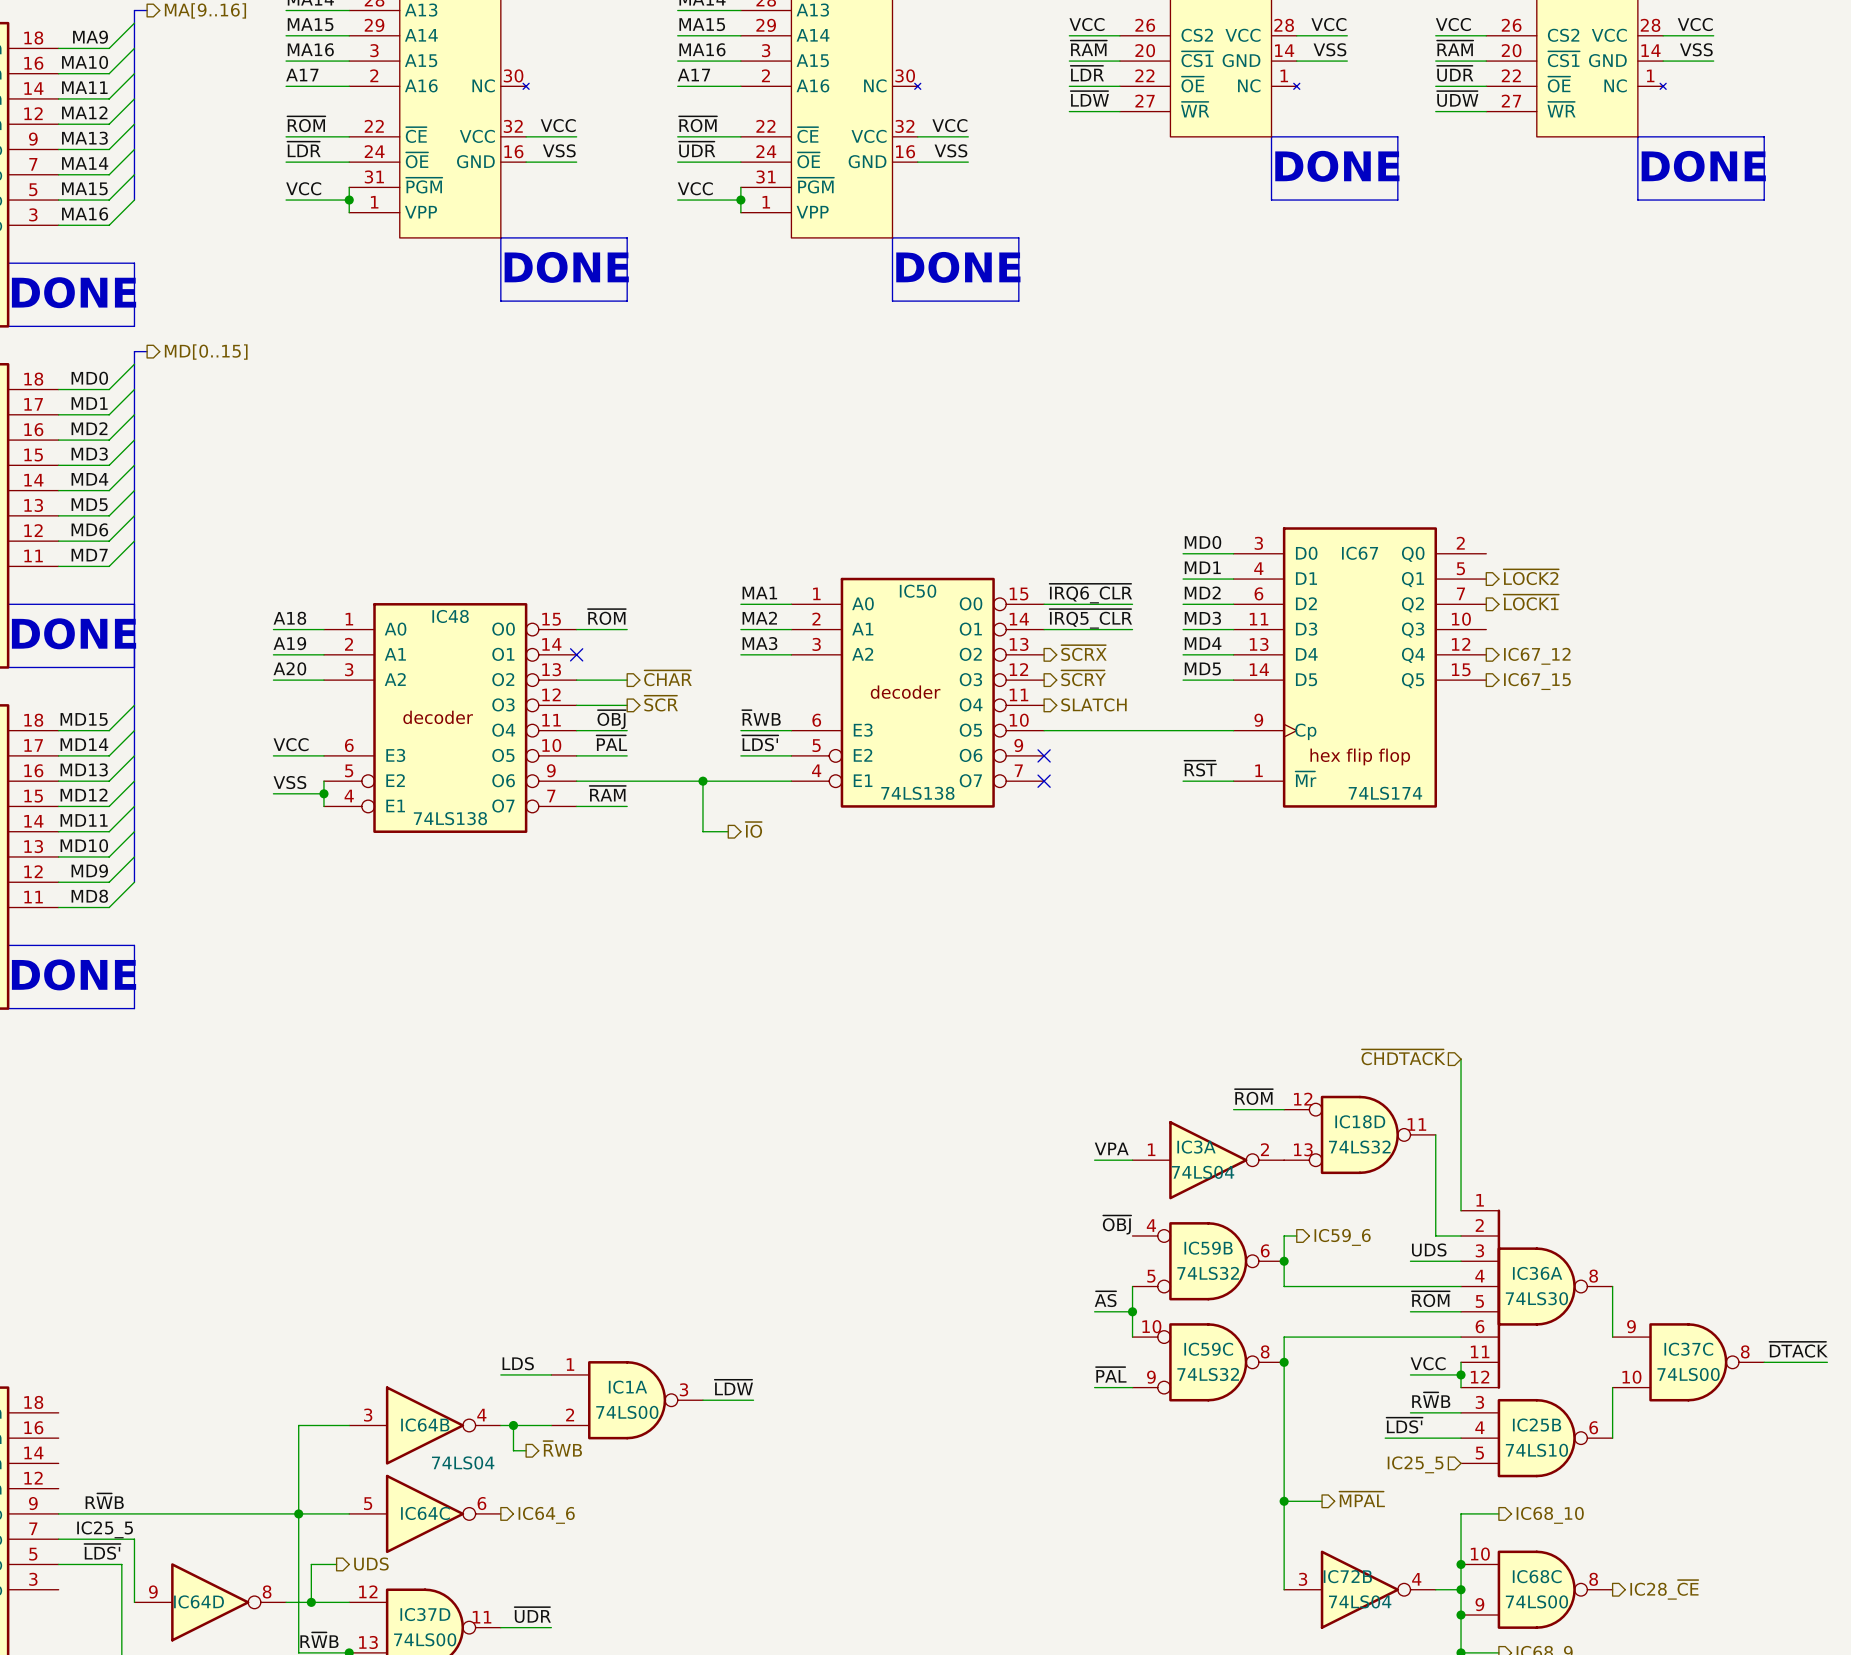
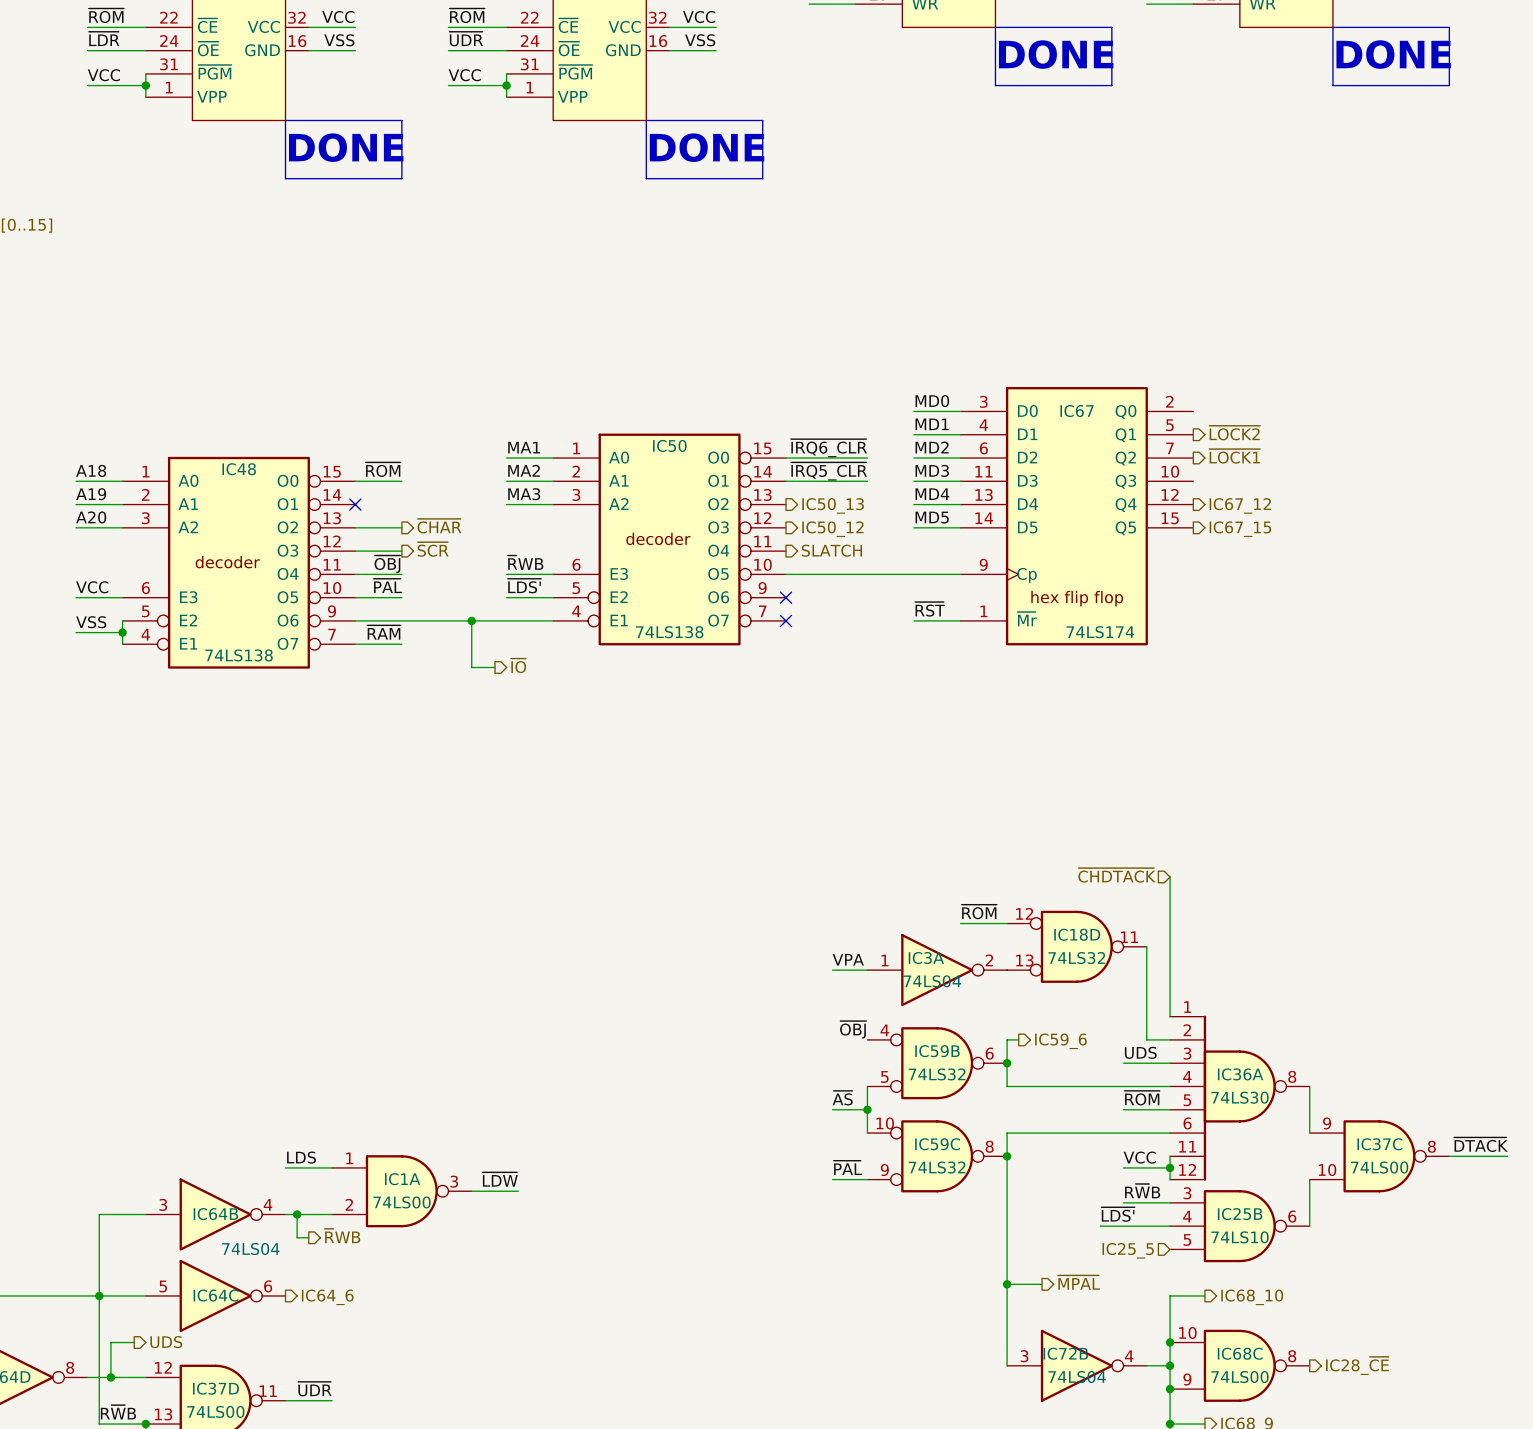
hierarchical label: ~{SCRX} (1083, 653) -> IC50_13 (833, 505)
hierarchical label: ~{SCRY} (1083, 678) -> IC50_12 (832, 529)

